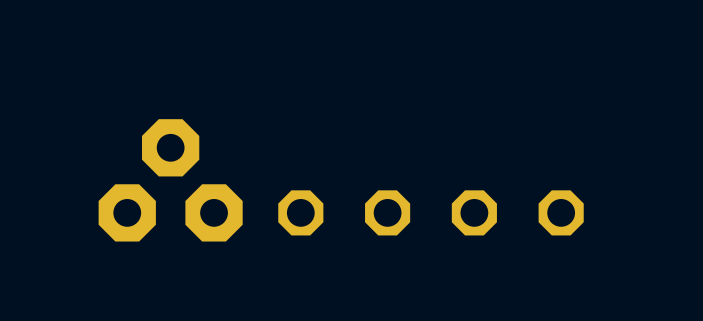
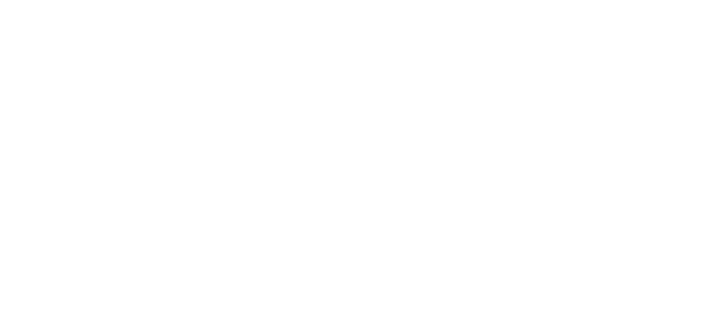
part: (170, 180) -> none
part: (344, 212) -> none
part: (517, 212) -> none

